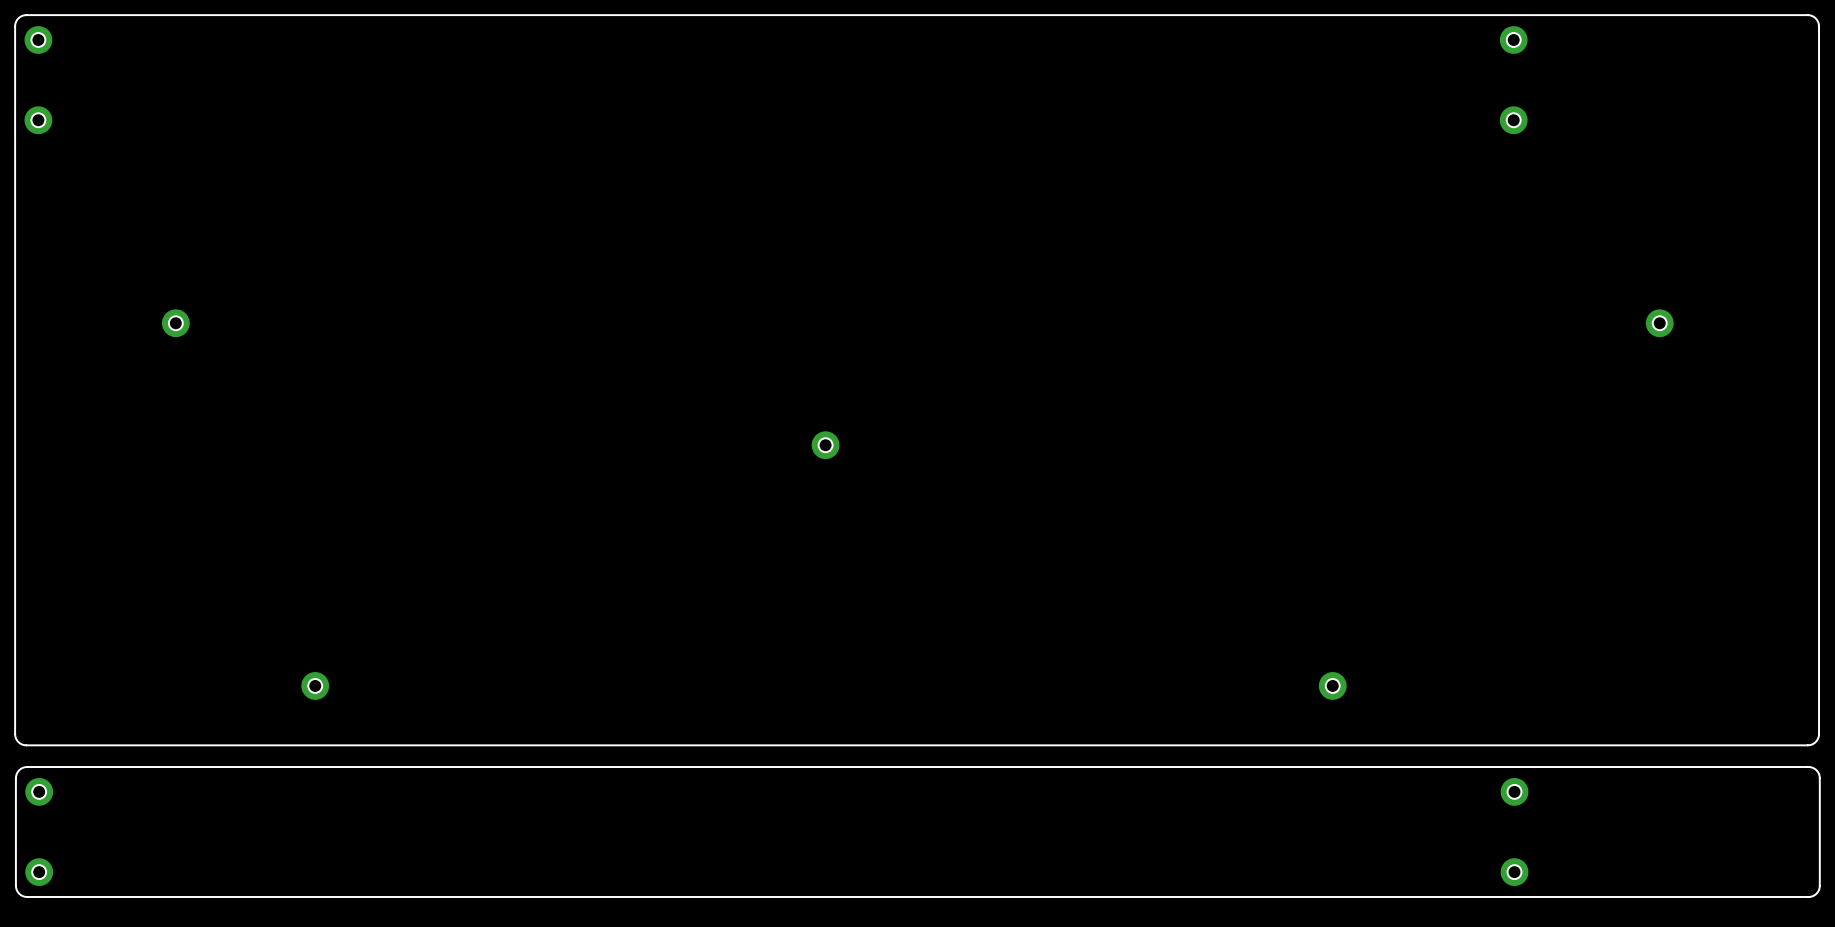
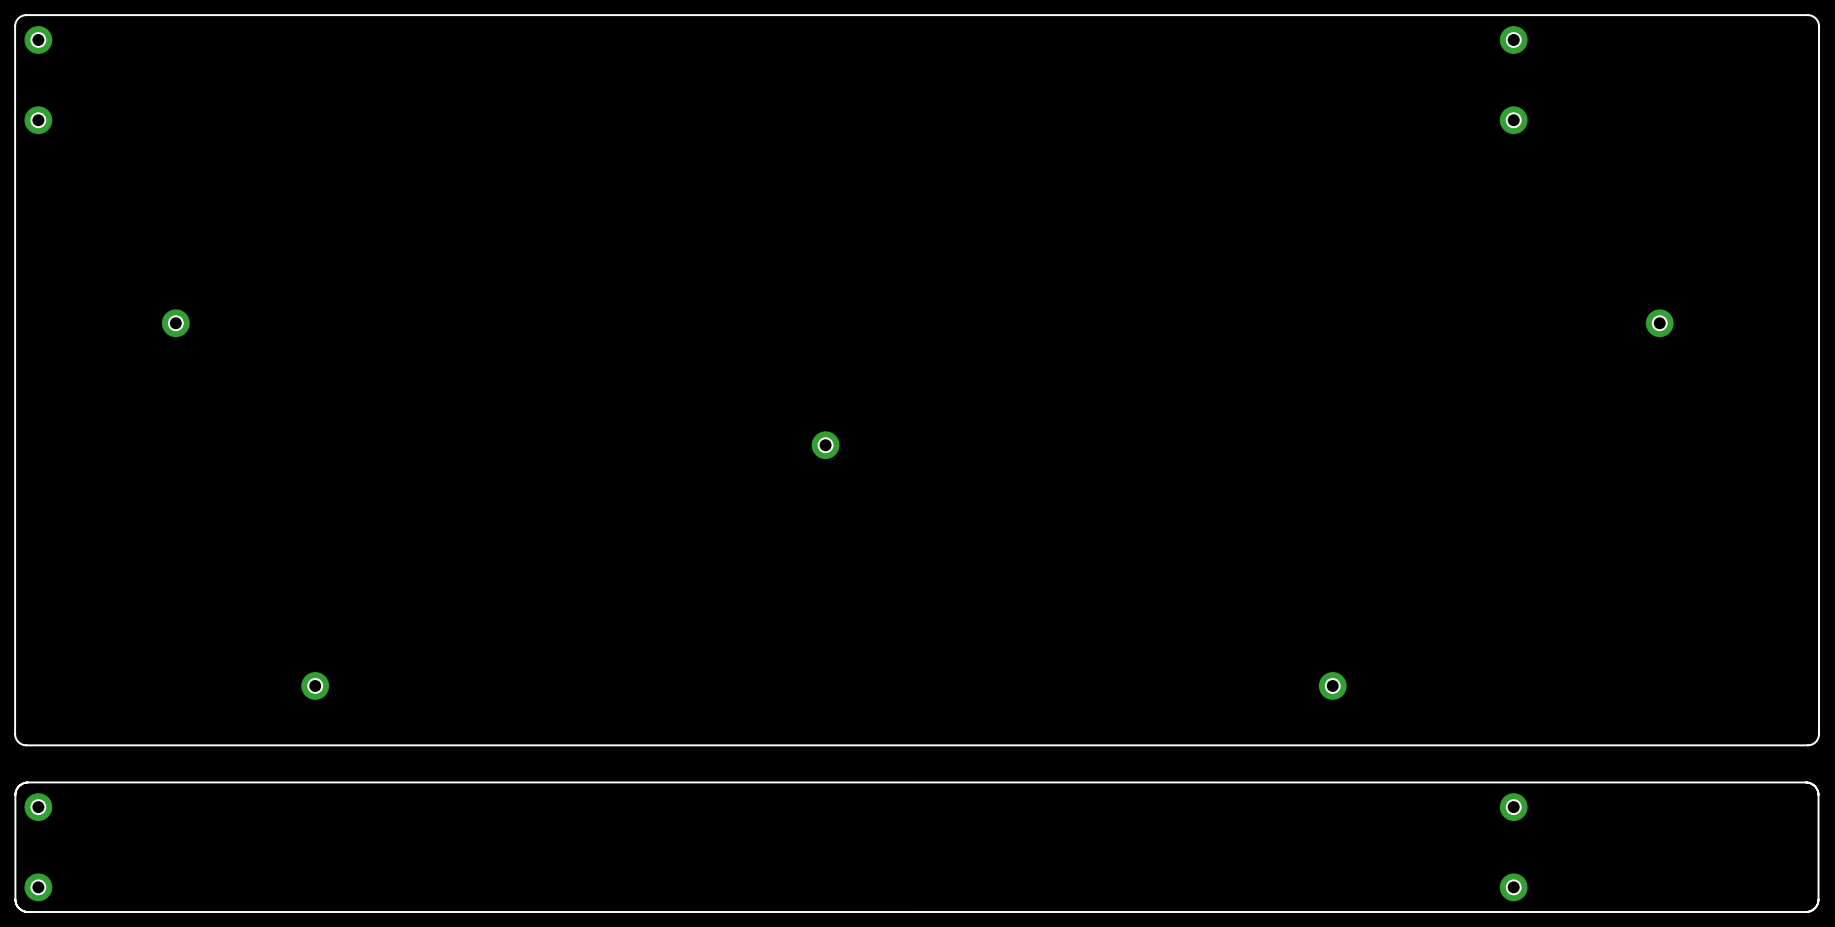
board edge: (27, 767) (1810, 767) (1816, 770) (1819, 776) (1819, 887) (1815, 894) (1808, 897) (25, 896) (19, 893) (16, 887) (15, 778) (19, 770) (27, 767) -> (28, 782) (19, 786) (15, 795) (15, 900) (19, 908) (27, 911) (1805, 911) (1814, 908) (1818, 900) (1818, 794) (1814, 786) (1806, 782) (28, 782)
part position: (39, 791) -> (38, 807)
round board edge position: (39, 791) -> (38, 807)
part position: (1514, 791) -> (1513, 807)
round board edge position: (1514, 791) -> (1513, 807)
part position: (39, 872) -> (38, 887)
round board edge position: (39, 872) -> (38, 887)
part position: (1514, 872) -> (1513, 887)
round board edge position: (1514, 872) -> (1513, 887)

